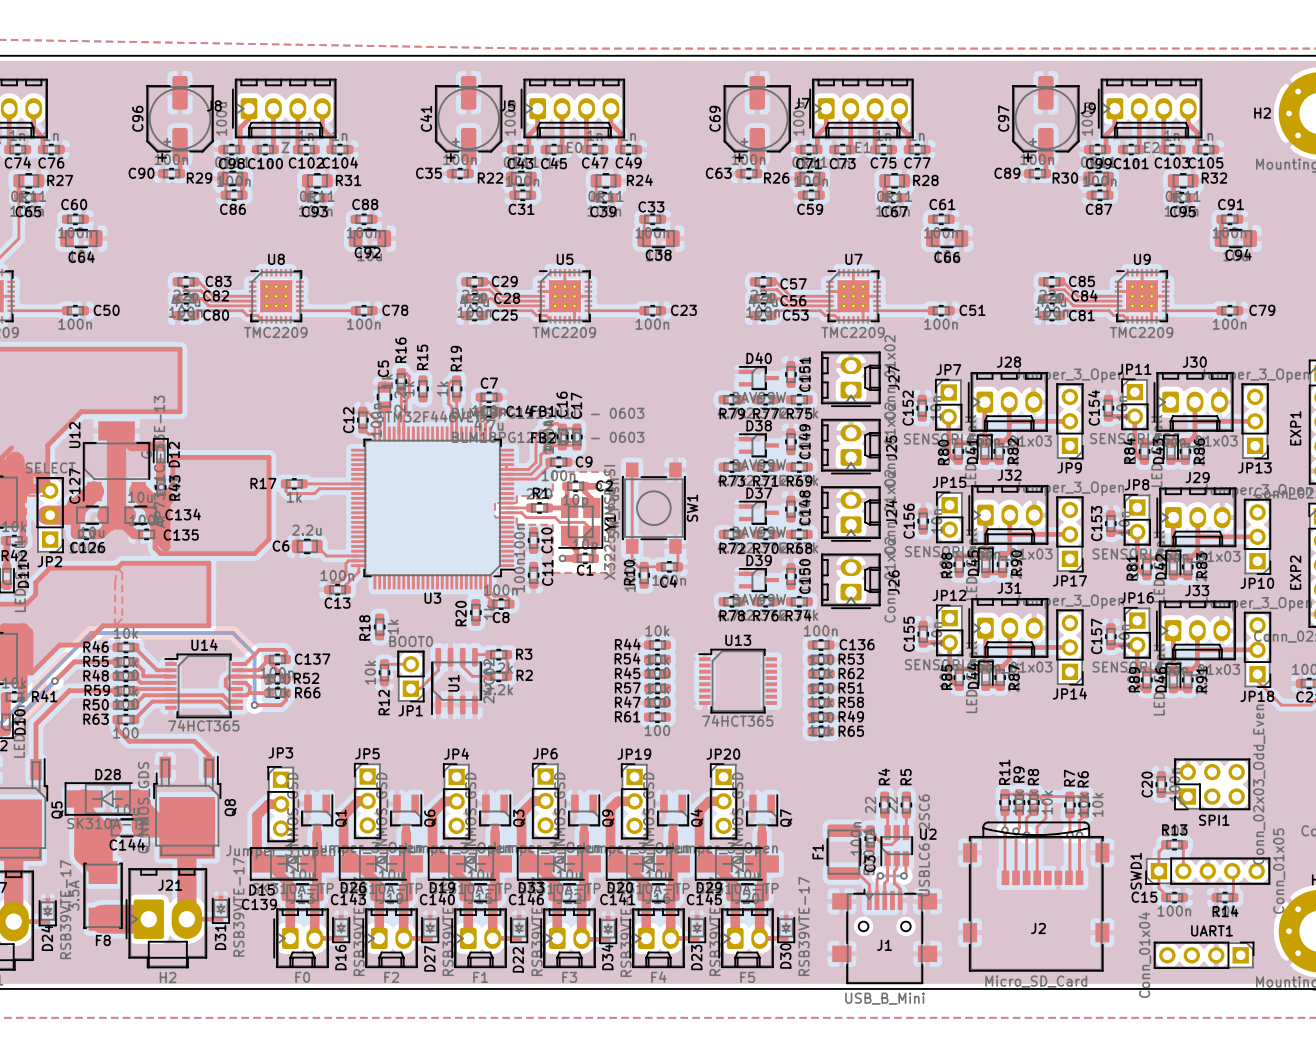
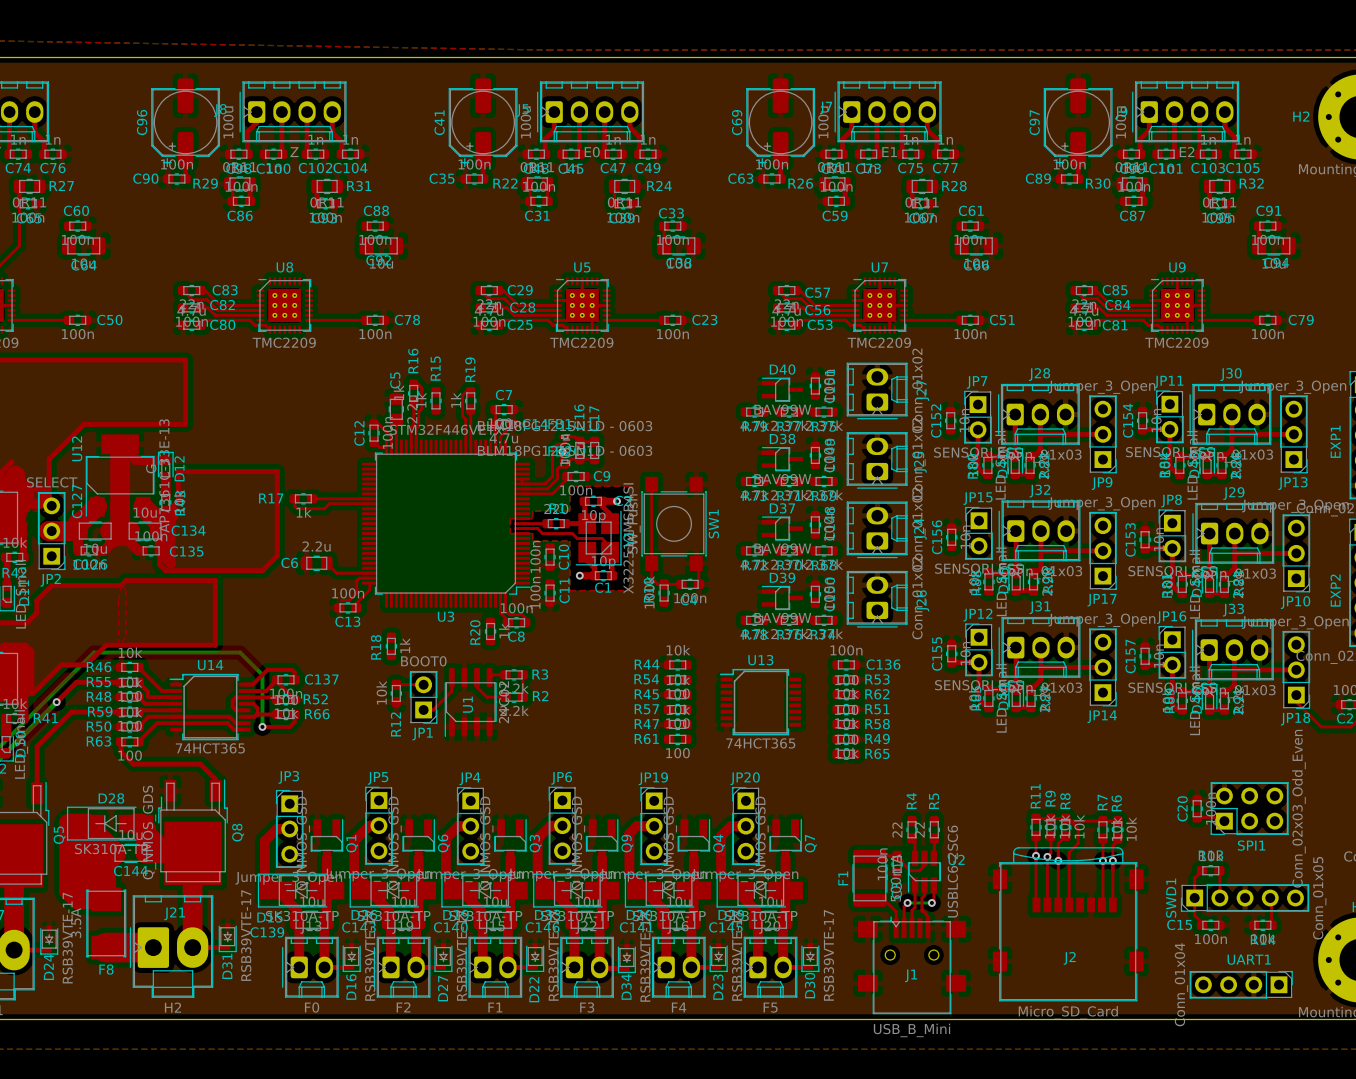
top track: none -> (116, 853) (86, 823) (69, 823) (69, 890) (77, 899) (105, 899)

